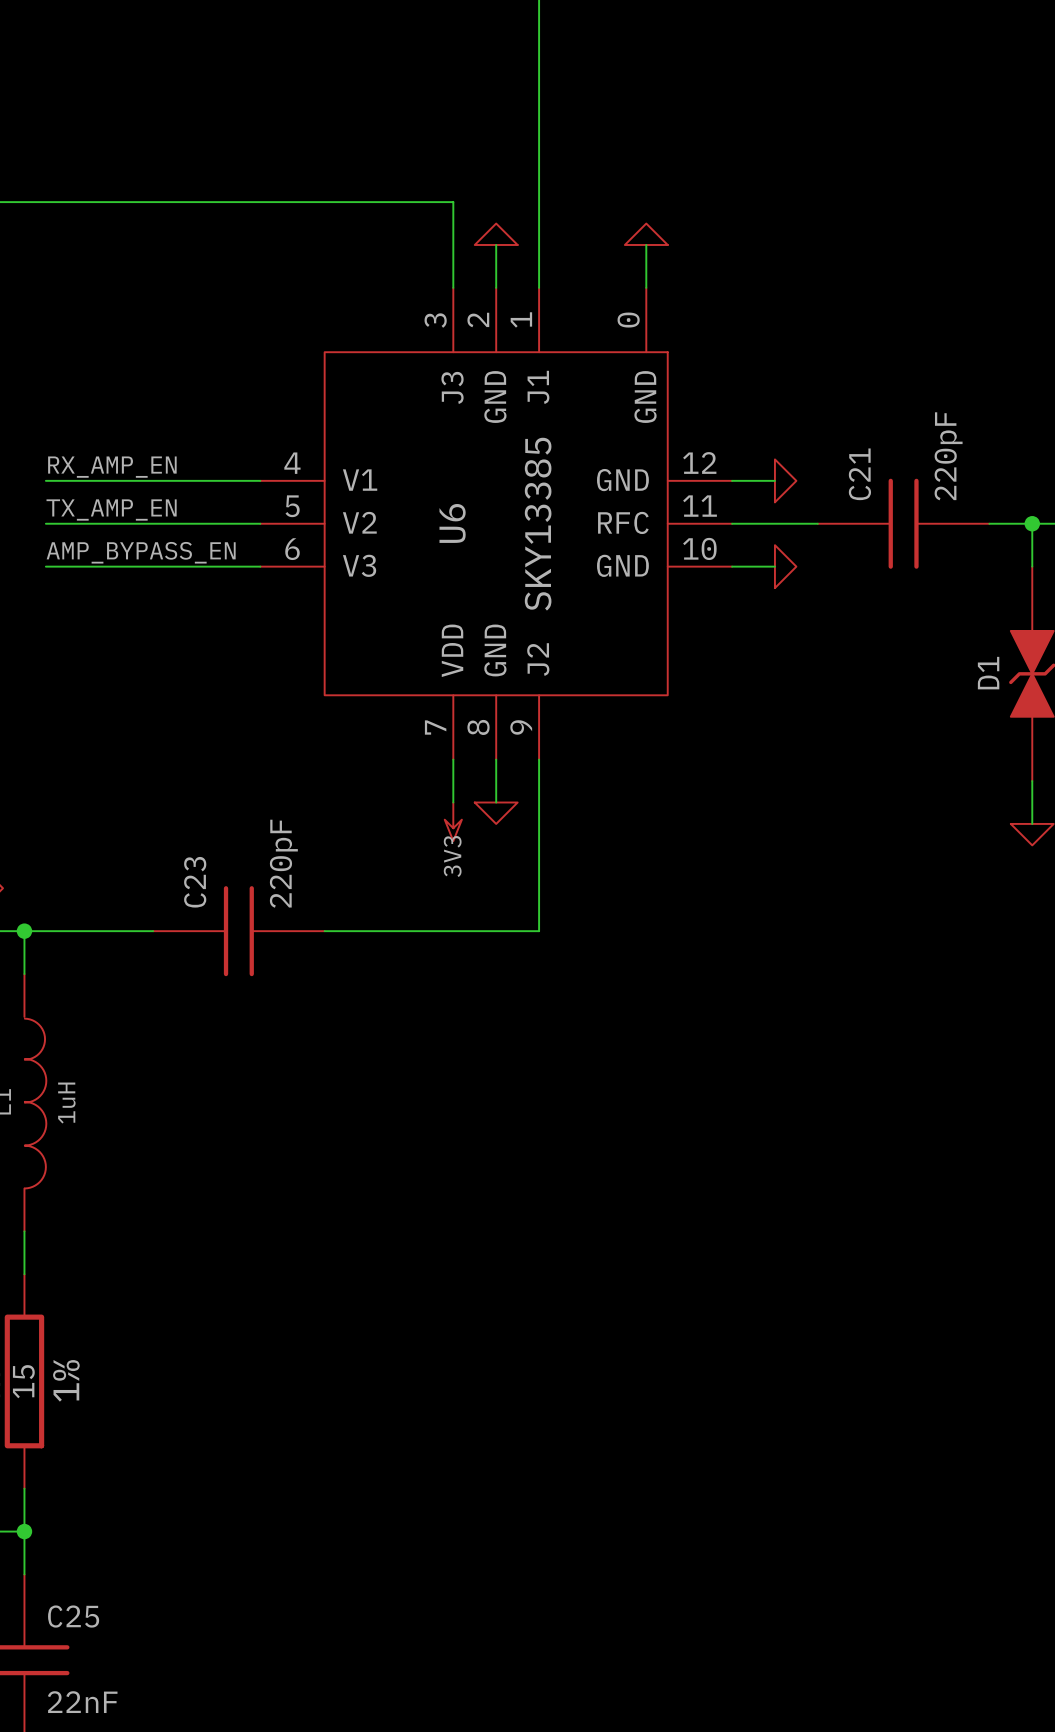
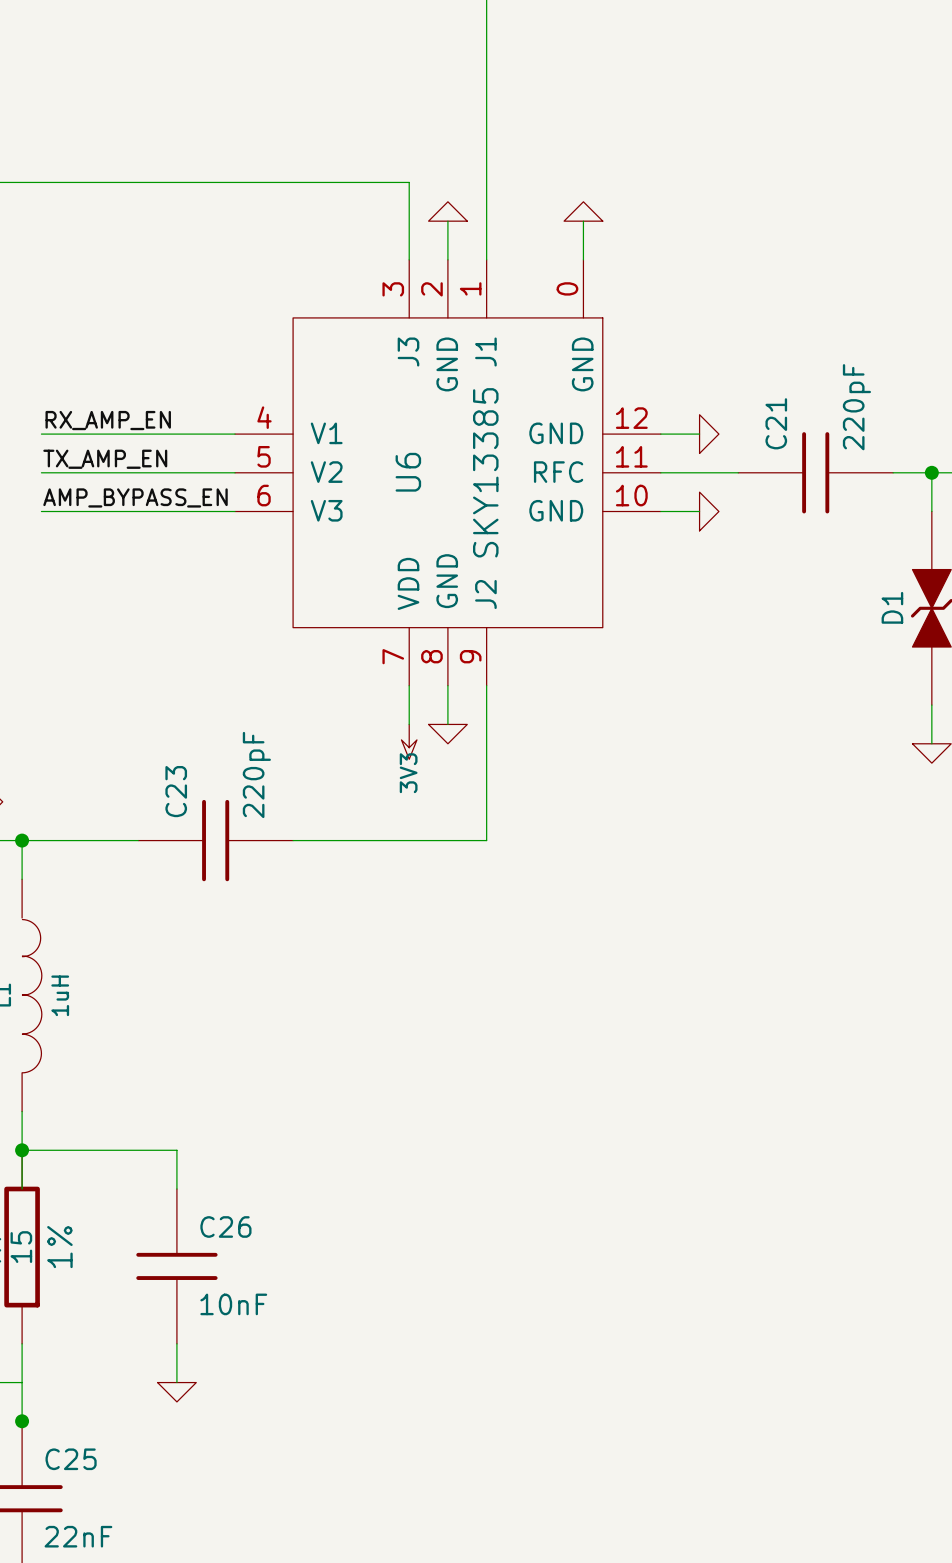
junction: none -> (22, 1150)
wire: none -> (22, 1189) (22, 1150) (176, 1150) (176, 1189)
C26: none -> 10nF (176, 1266)
wire: none -> (176, 1343) (176, 1382)
junction position: (24, 1531) -> (22, 1421)
power symbol: none -> (176, 1392)

